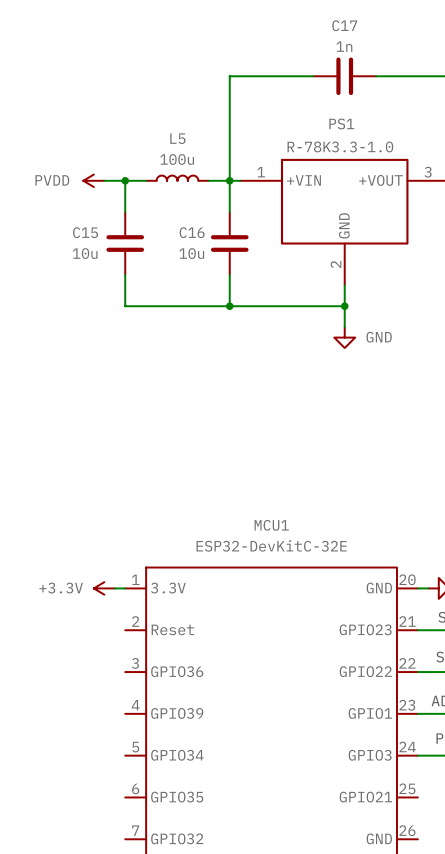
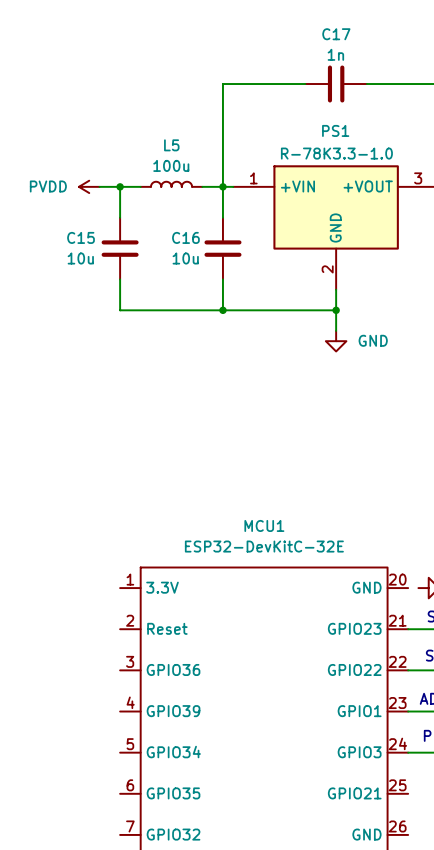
power symbol: +3.3V (104, 588) -> none
wire: (114, 588) (125, 588) -> none
wire: (417, 588) (428, 588) -> none

